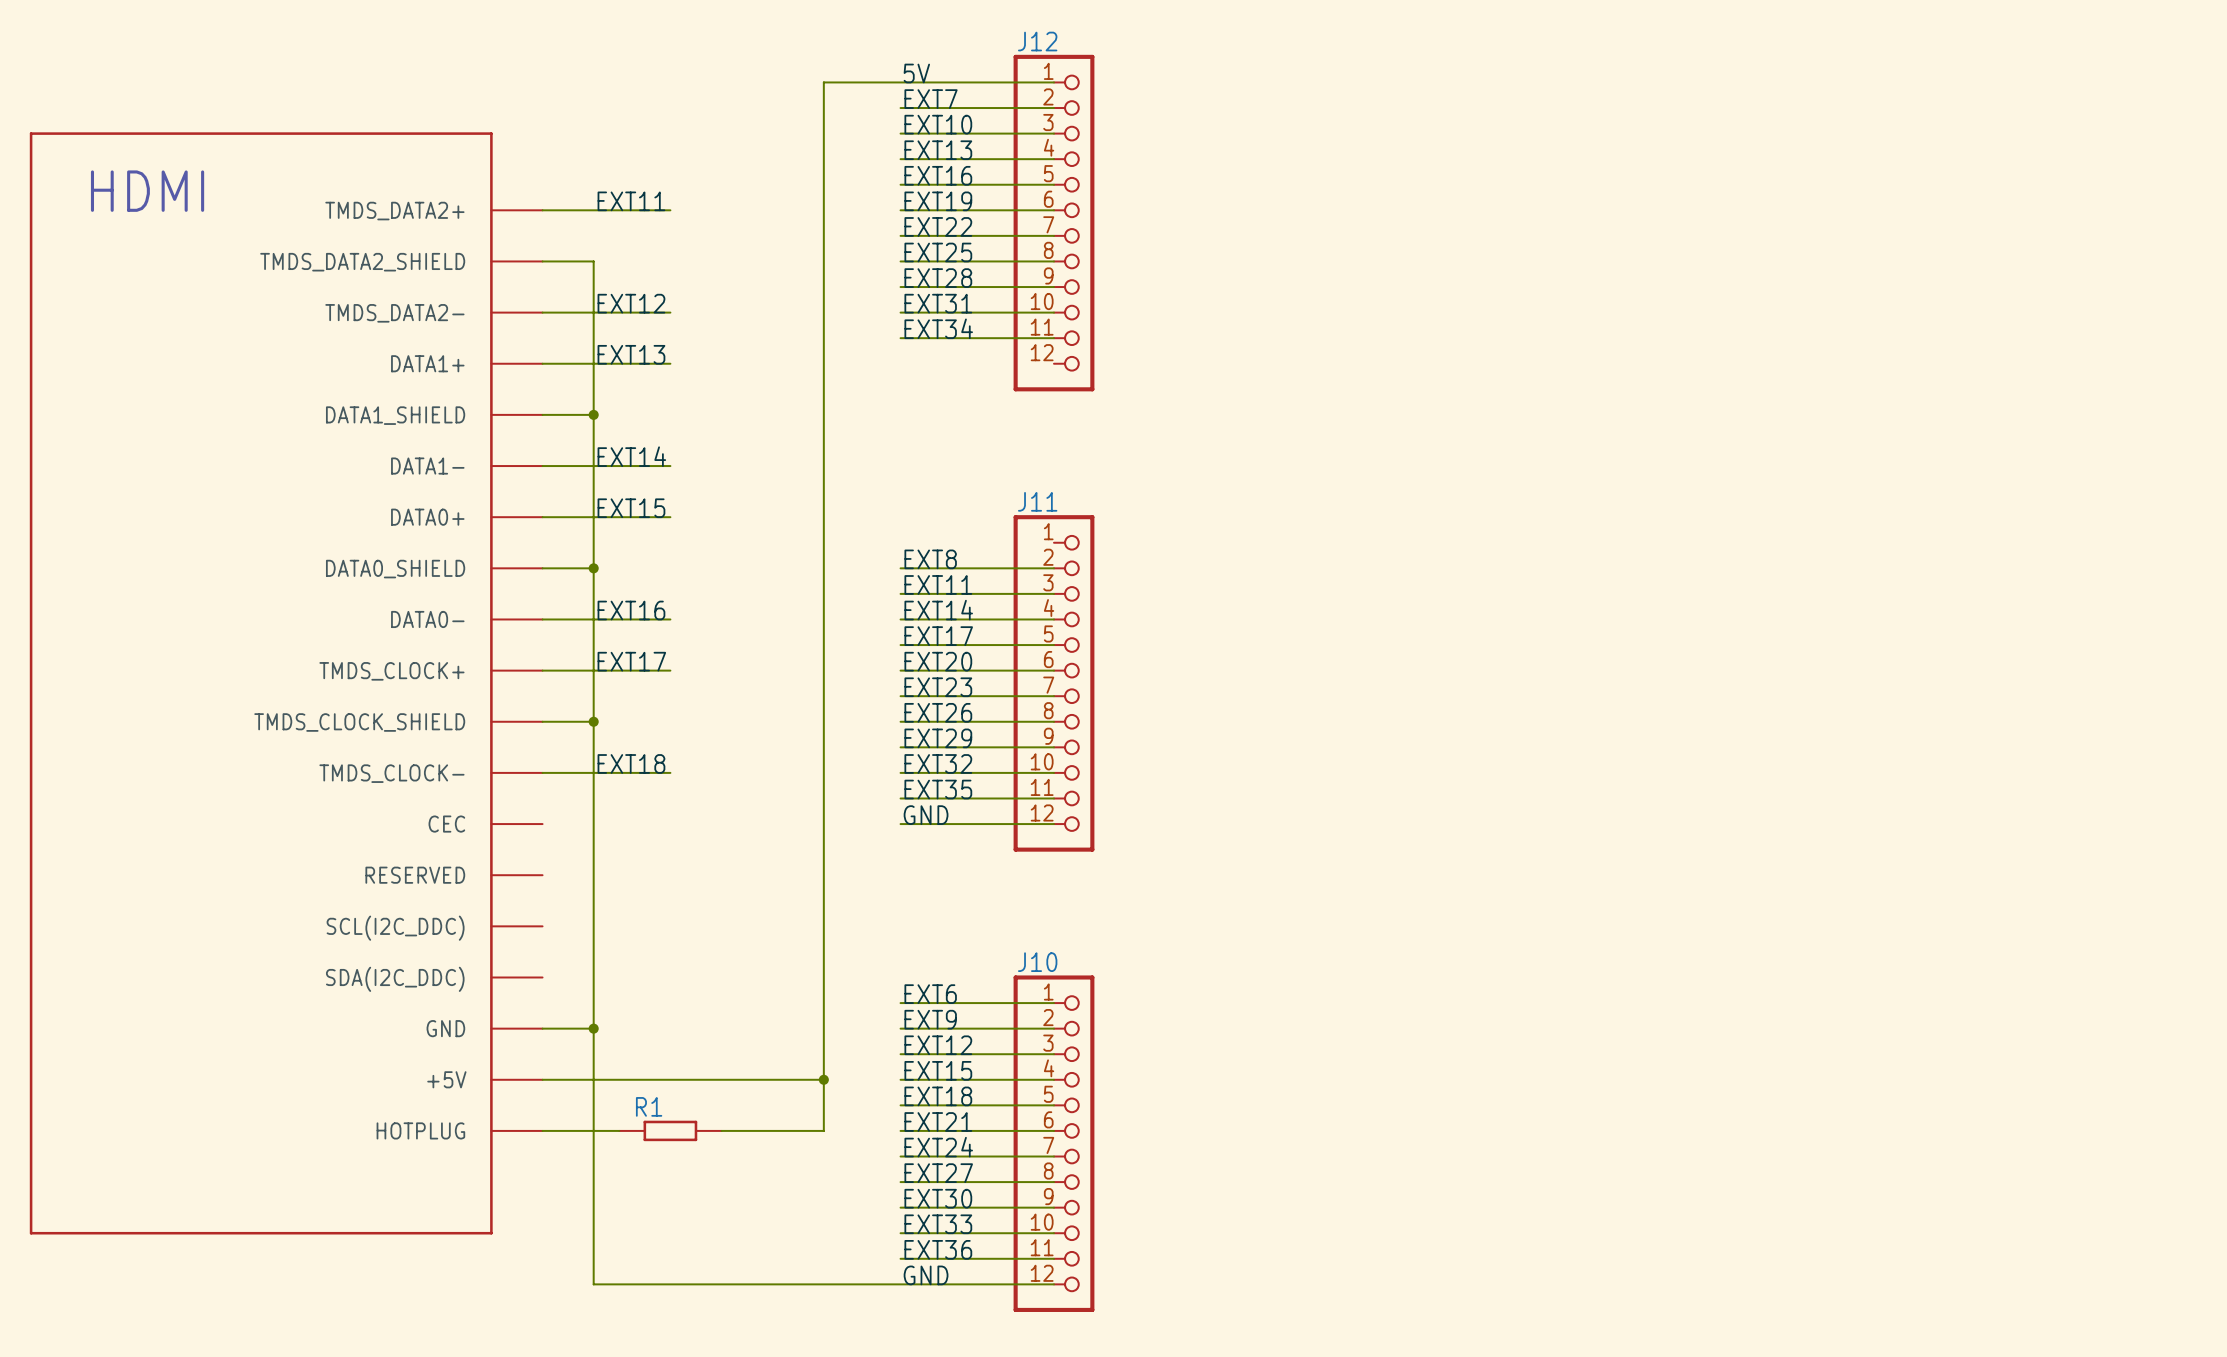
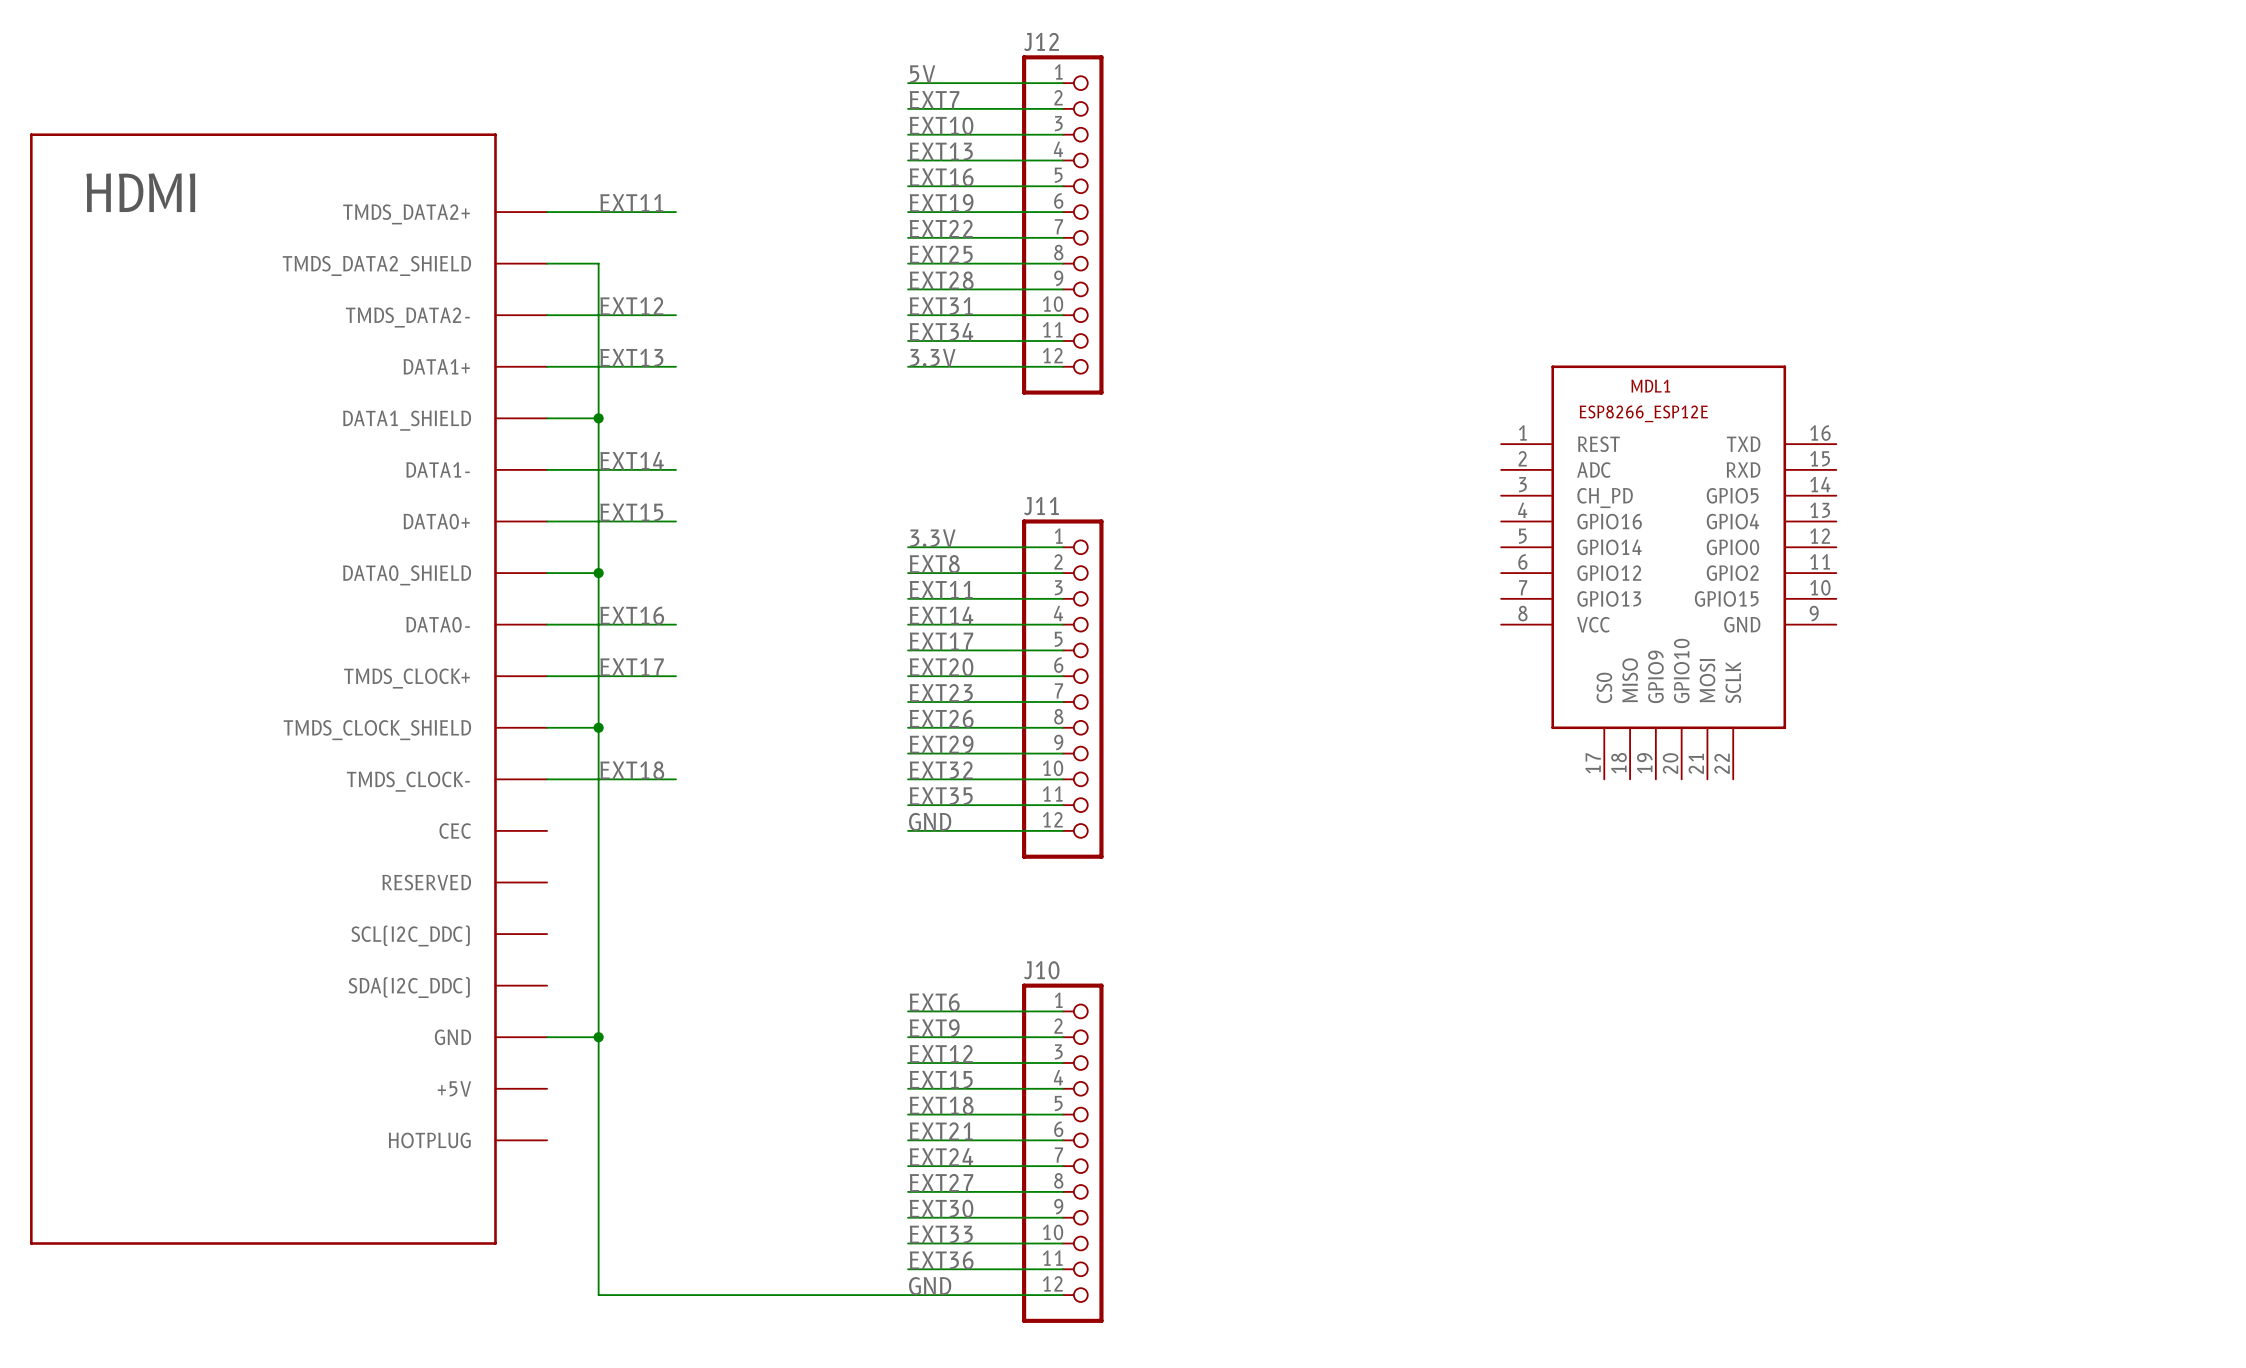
wire: (900, 82) (823, 82) (823, 1130) (721, 1130) -> none
label: none -> 3.3V (932, 357)
wire: none -> (908, 366) (1062, 366)
label: none -> 3.3V (932, 538)
wire: none -> (908, 547) (1062, 547)
MDL1: none -> (1668, 572)
wire: (542, 1079) (823, 1079) -> none
junction: (823, 1079) -> none
wire: (542, 1130) (619, 1130) -> none
R1: (670, 1130) -> none

